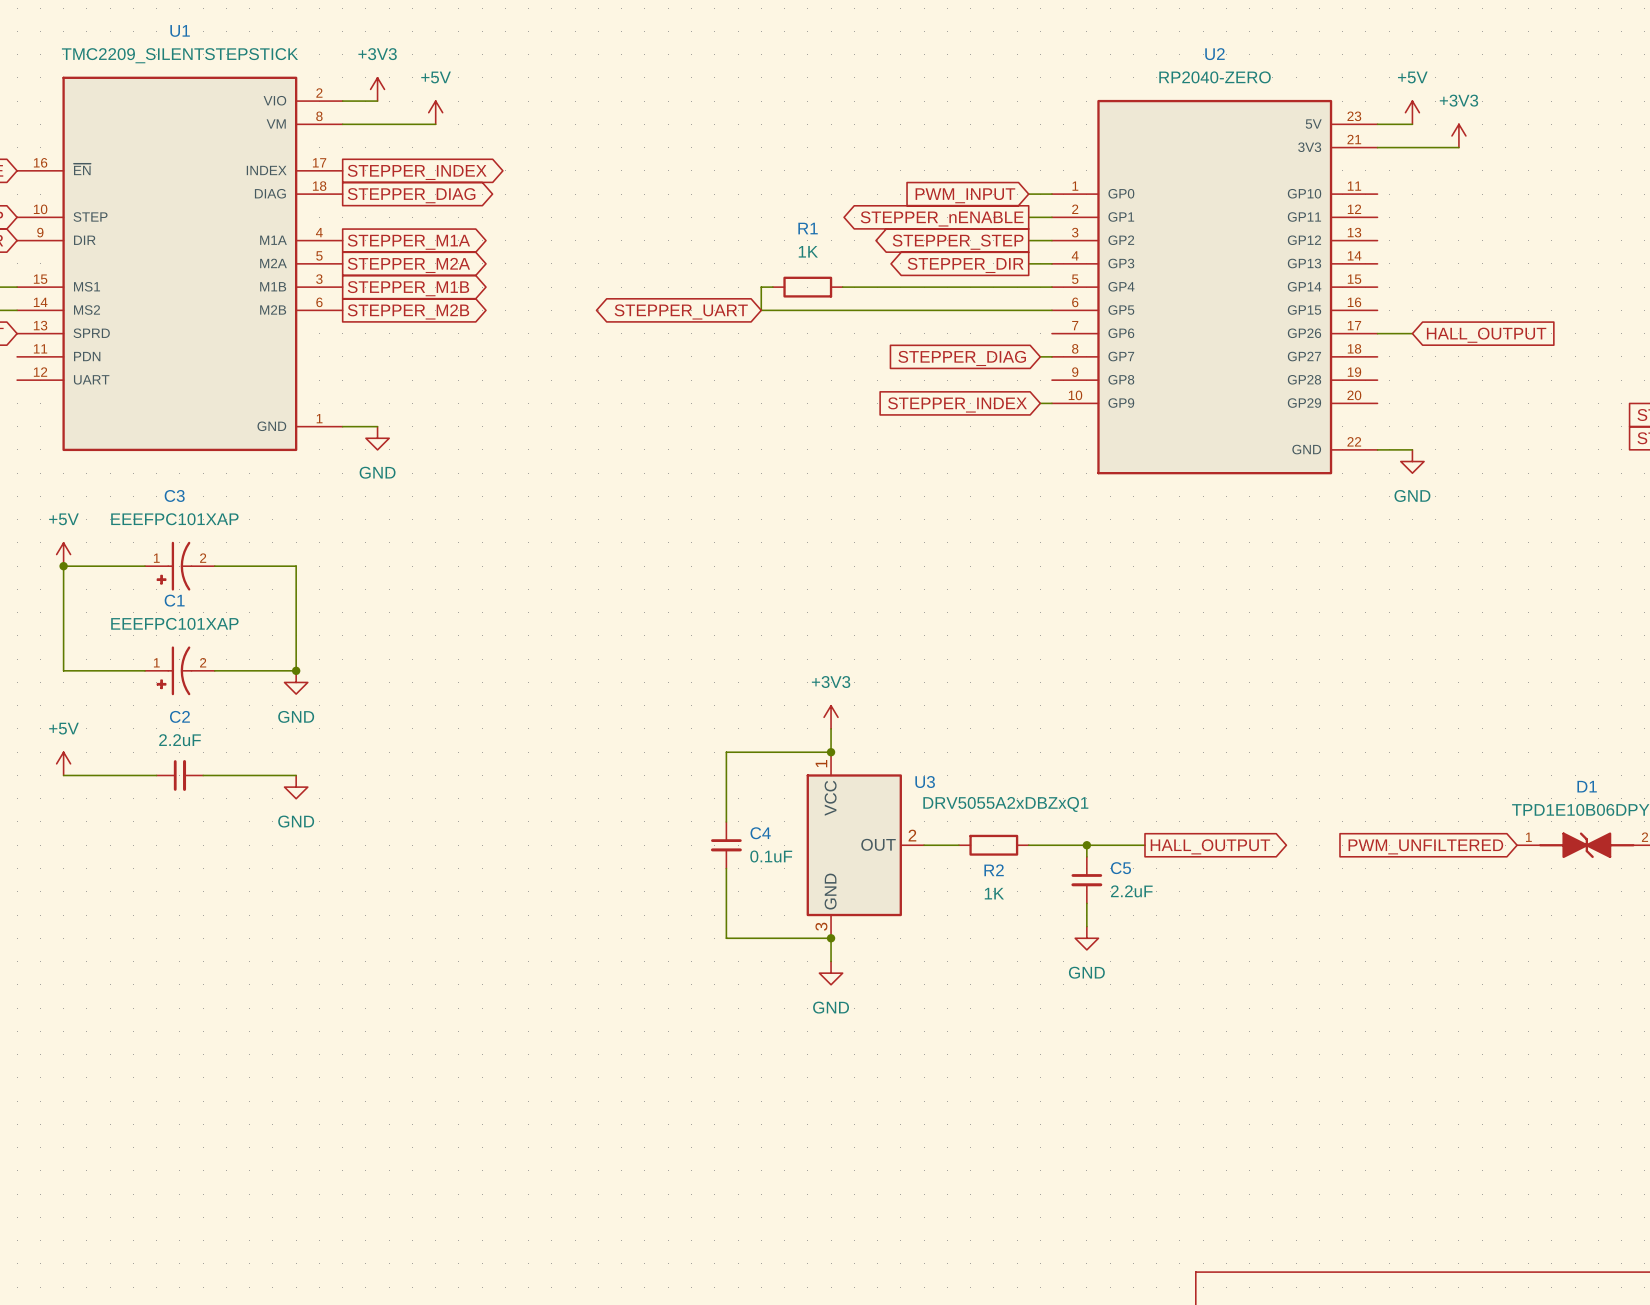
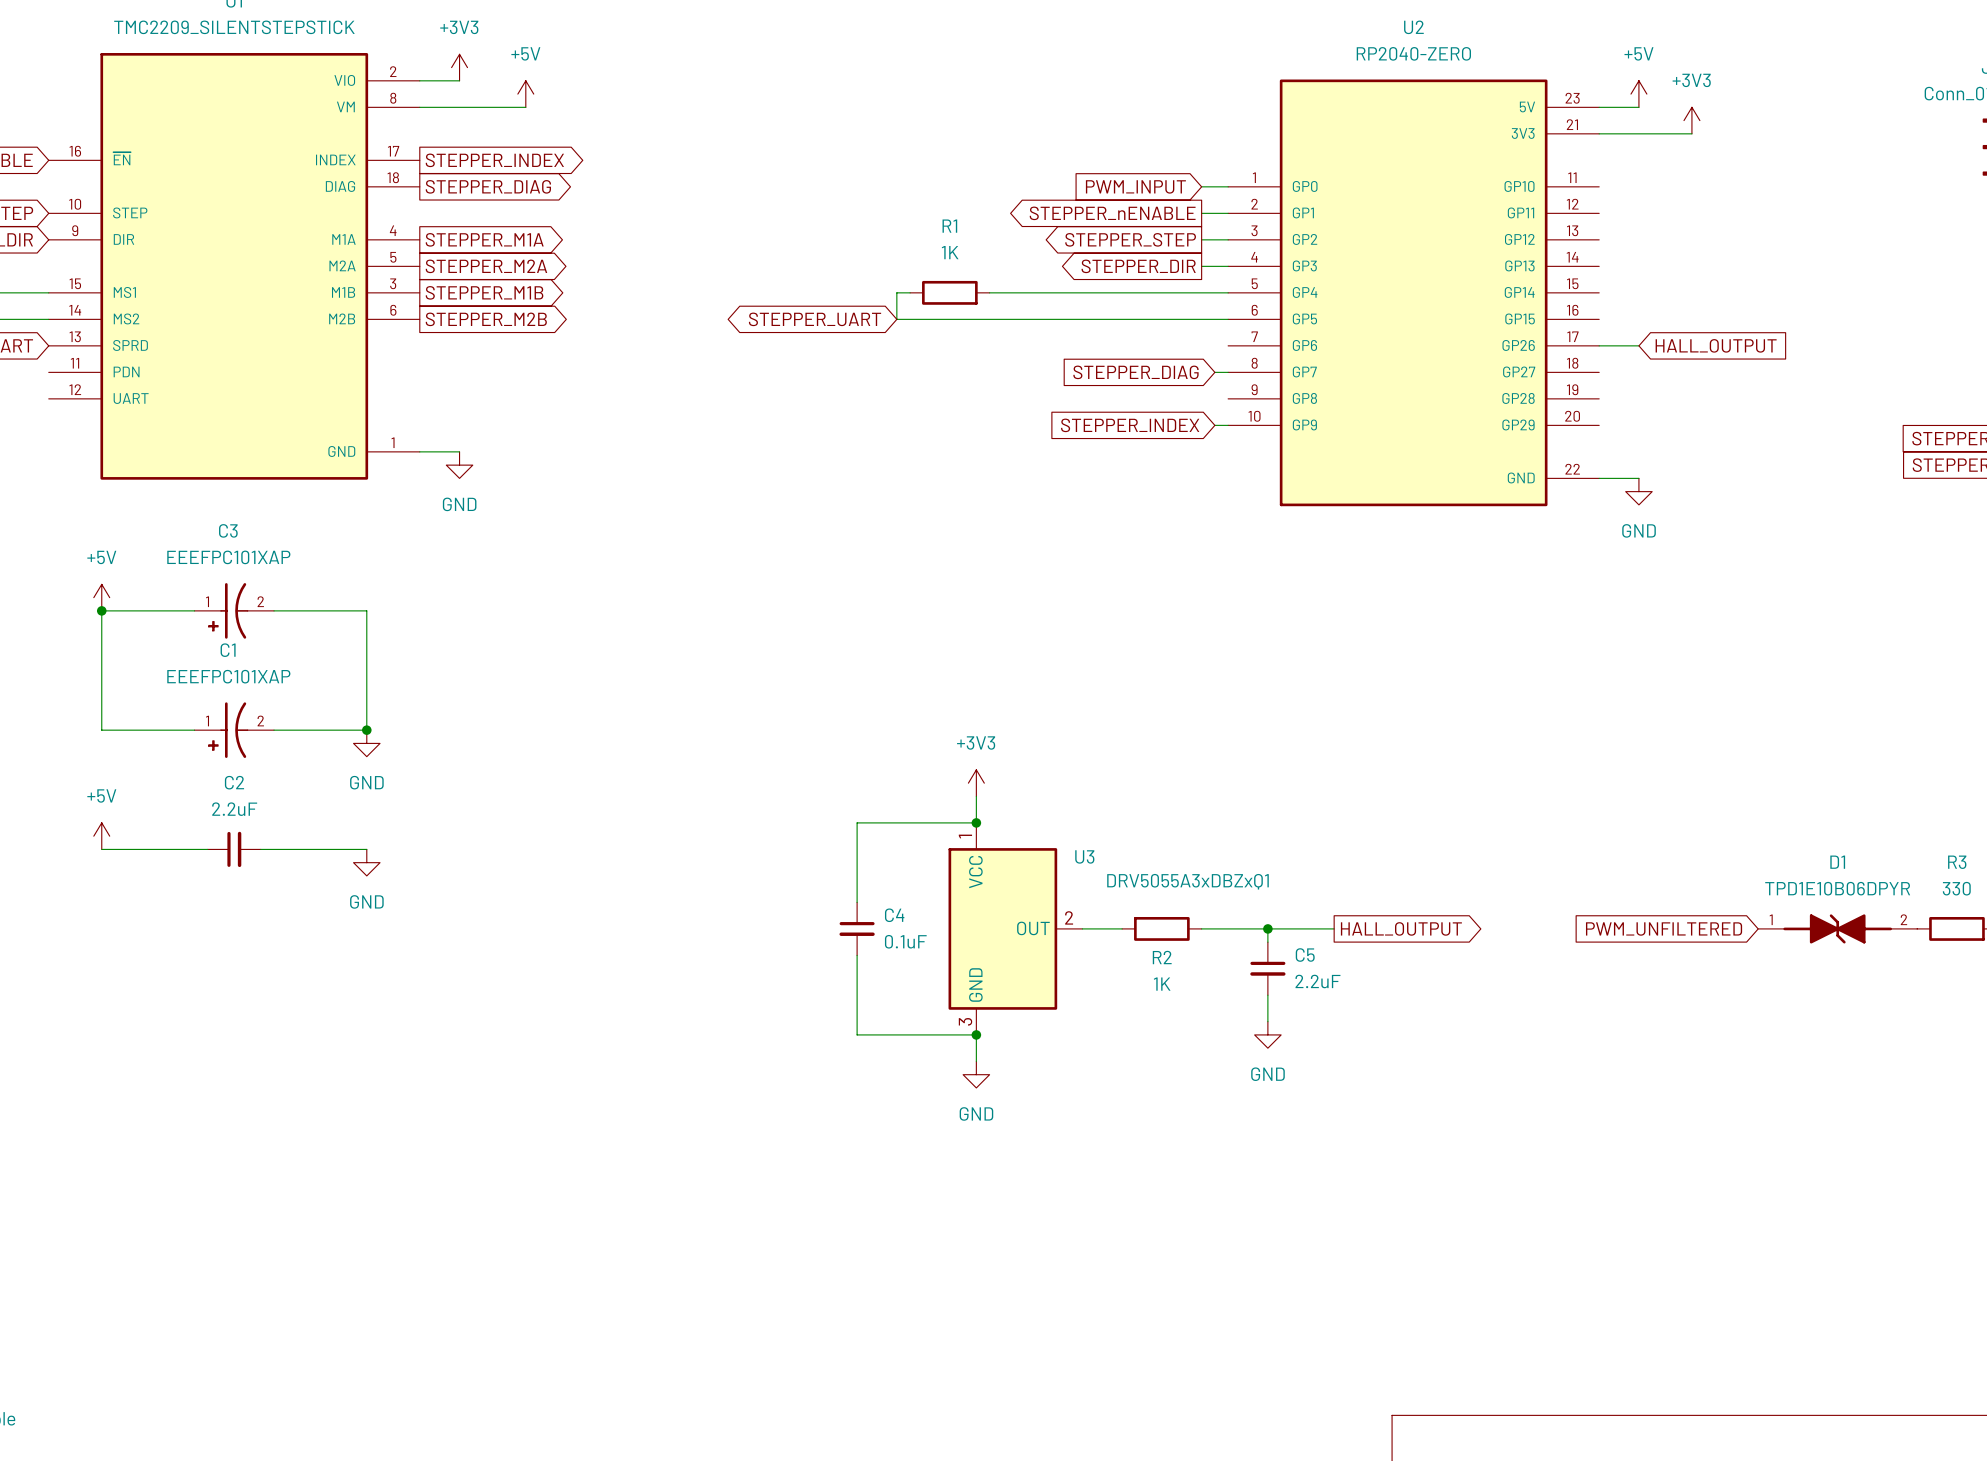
U3 value: DRV5055A2xDBZxQ1 (1005, 804) -> DRV5055A3xDBZxQ1 (1187, 881)

